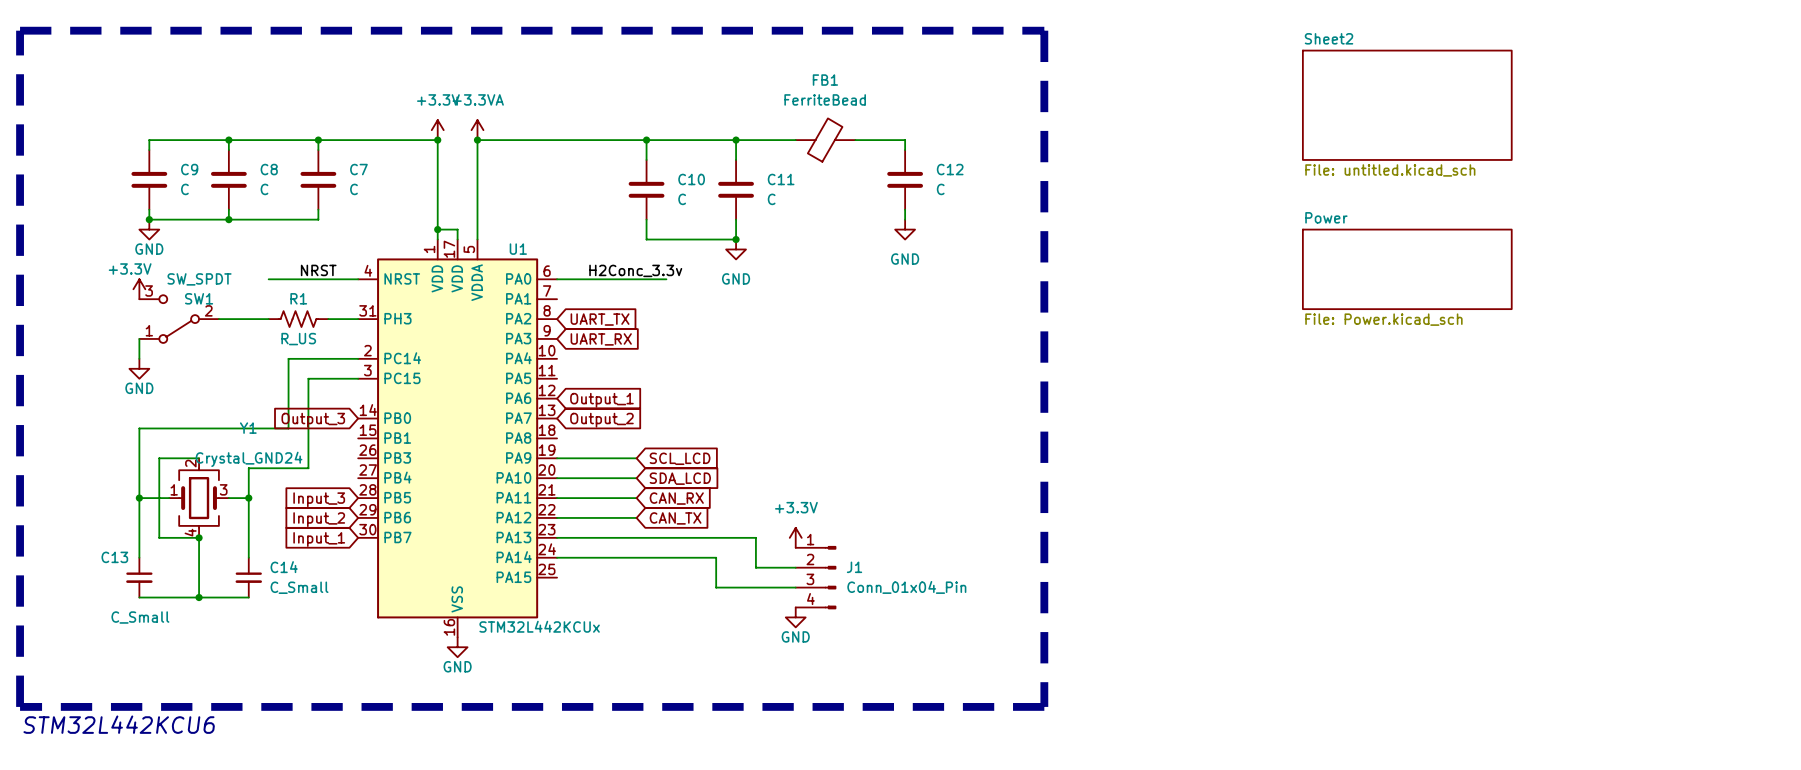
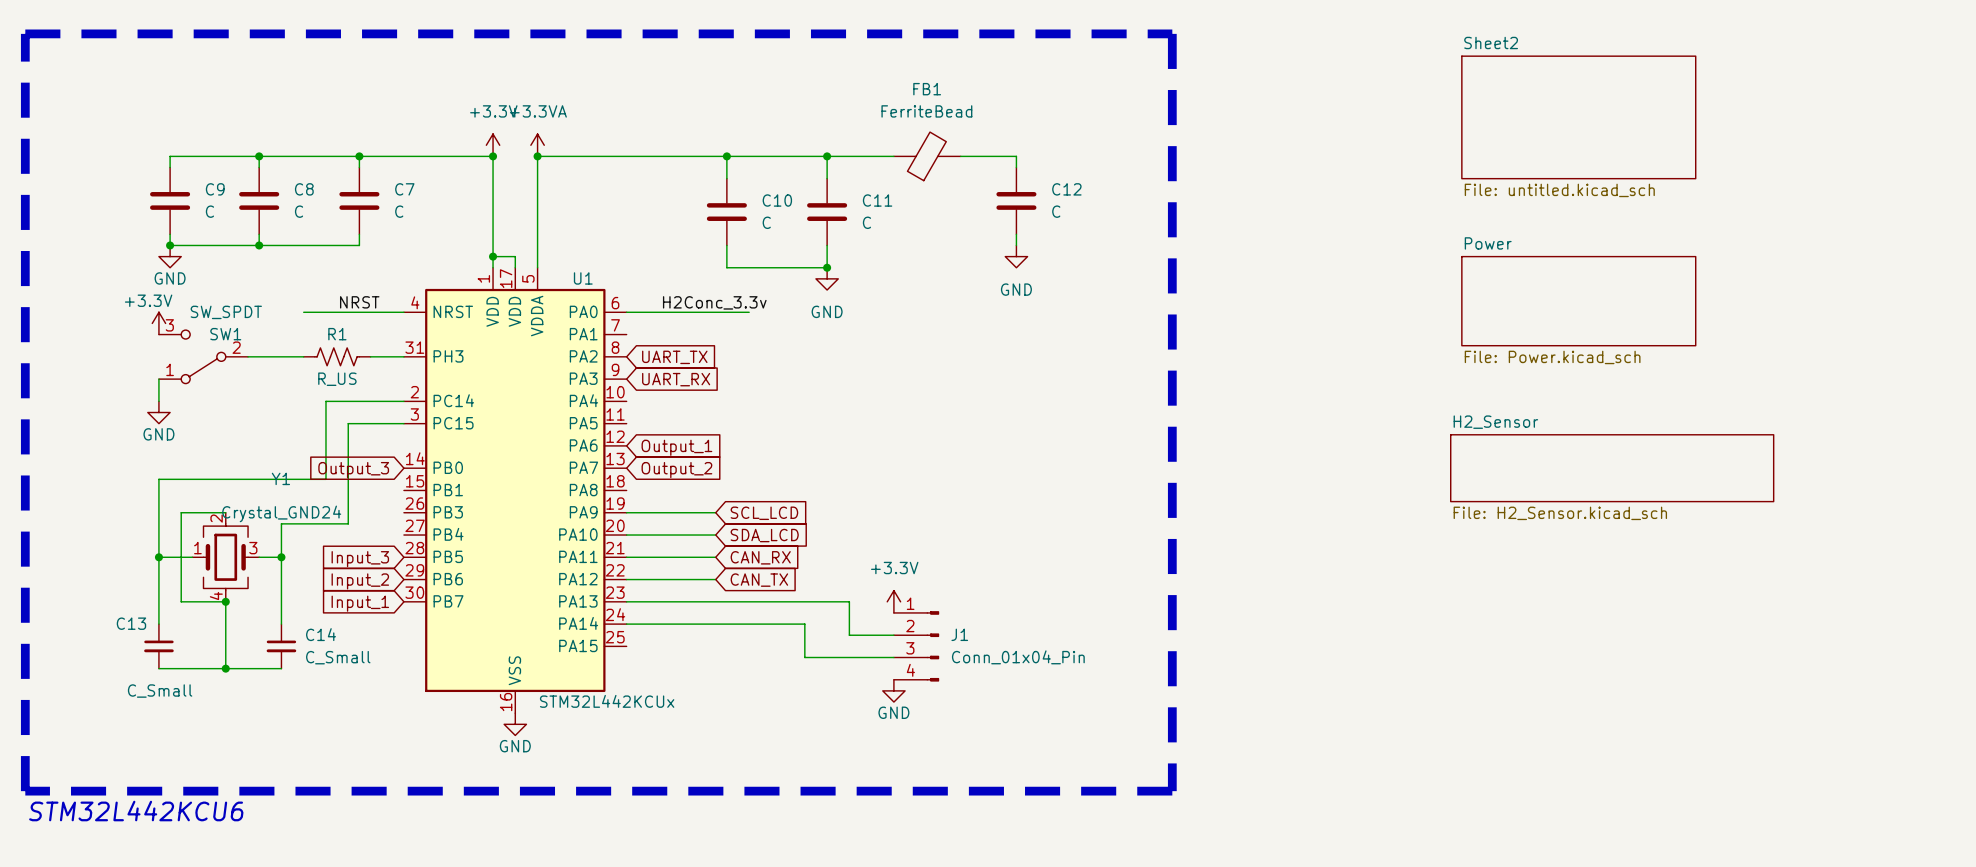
sheet H2_Sensor: none -> File: H2_Sensor.kicad_sch (1612, 468)

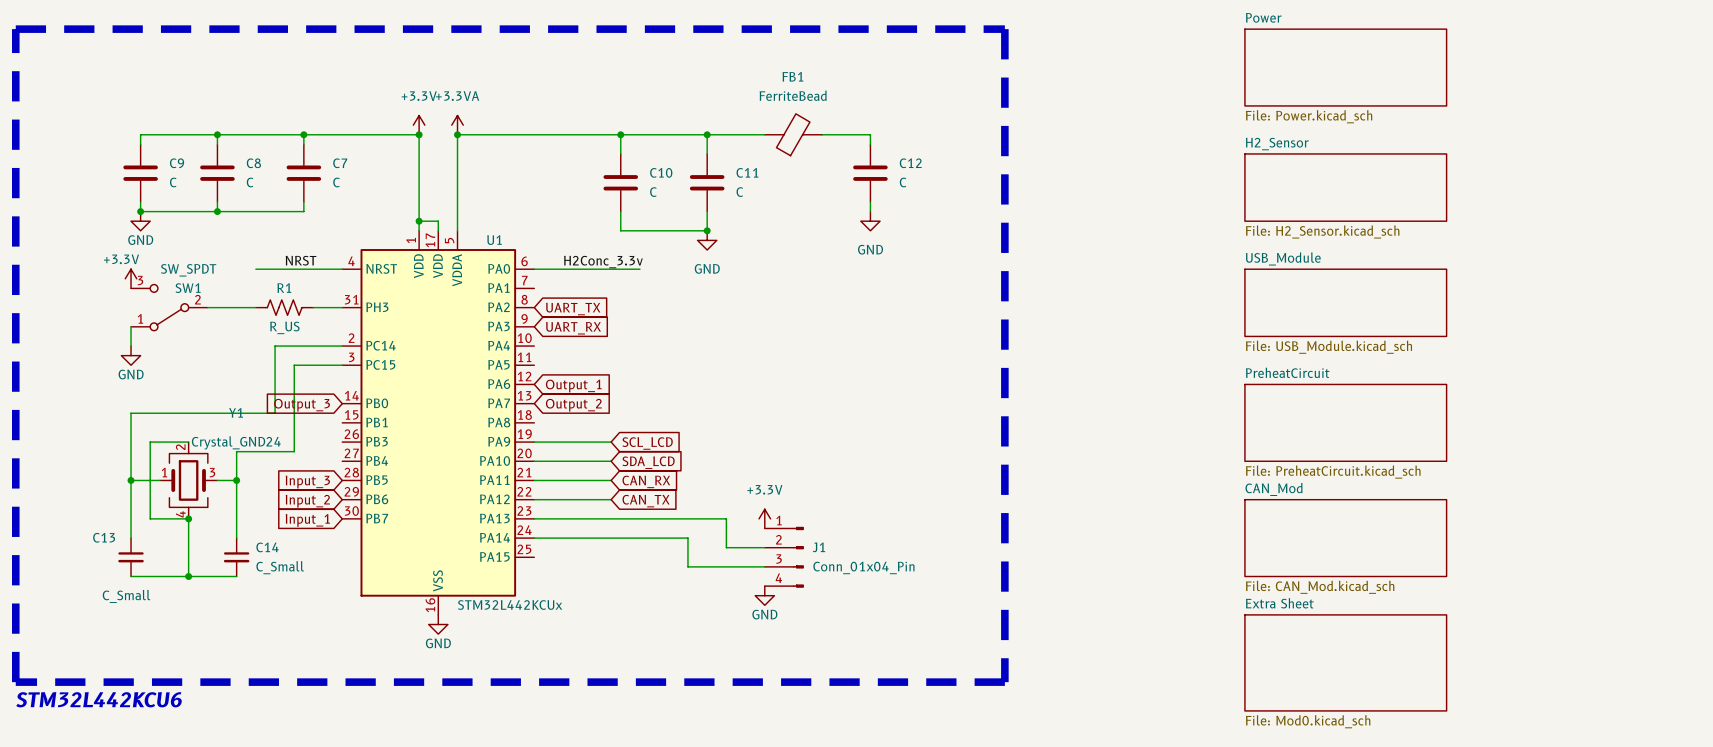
sheet Power: none -> File: Power.kicad_sch (1345, 67)
sheet Sheet2: File: untitled.kicad_sch (1578, 117) -> none
sheet Power: File: Power.kicad_sch (1578, 301) -> none
sheet USB_Module: none -> File: USB_Module.kicad_sch (1345, 302)
sheet H2_Sensor name position: H2_Sensor (1495, 422) -> H2_Sensor (1277, 144)
sheet H2_Sensor shape: [1450, 434, 1775, 503] -> [1244, 153, 1448, 222]
sheet PreheatCircuit: none -> File: PreheatCircuit.kicad_sch (1345, 422)
sheet H2_Sensor value position: File: H2_Sensor.kicad_sch (1560, 513) -> File: H2_Sensor.kicad_sch (1322, 231)
sheet CAN_Mod: none -> File: CAN_Mod.kicad_sch (1345, 538)
sheet Extra Sheet: none -> File: Mod0.kicad_sch (1345, 662)

